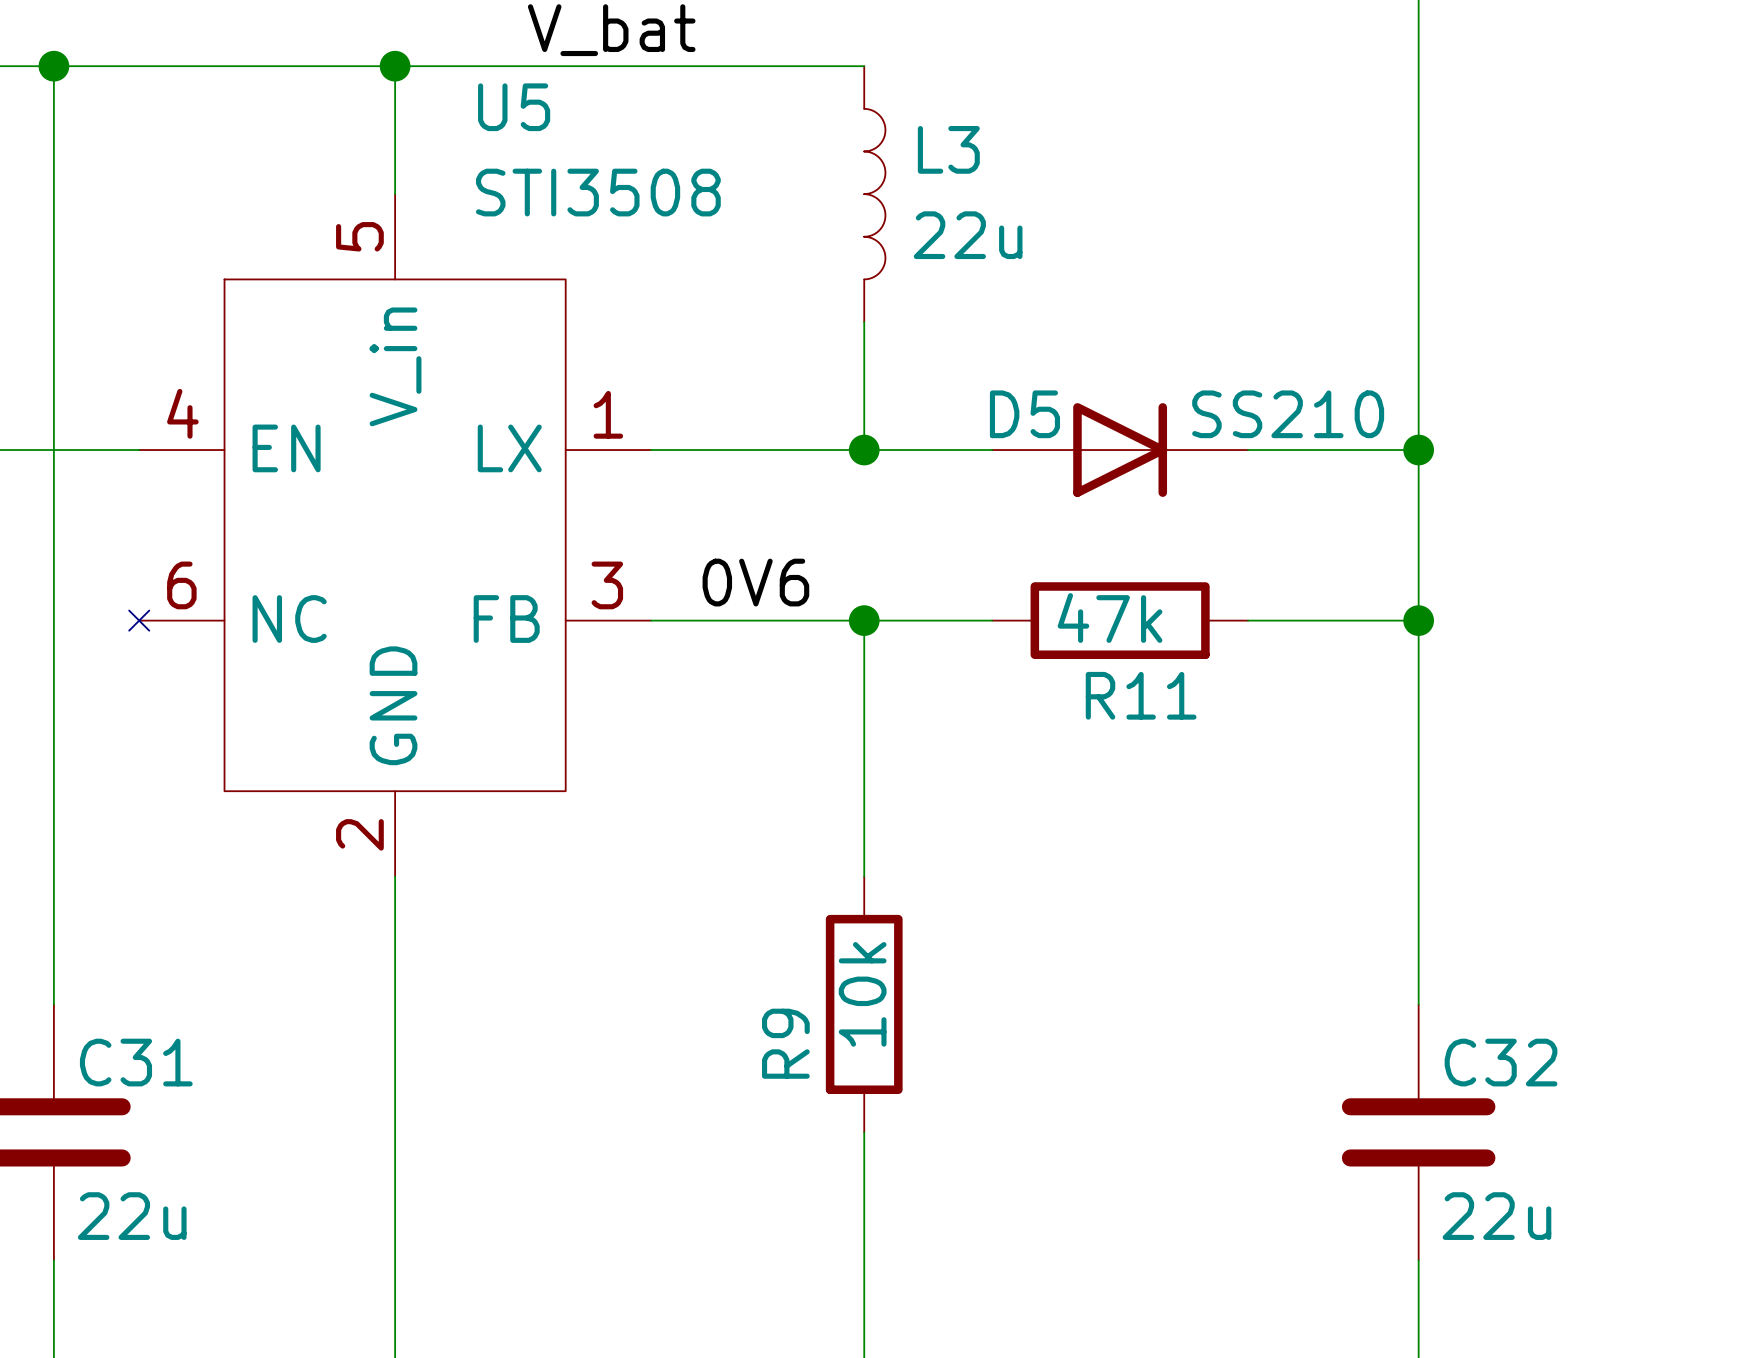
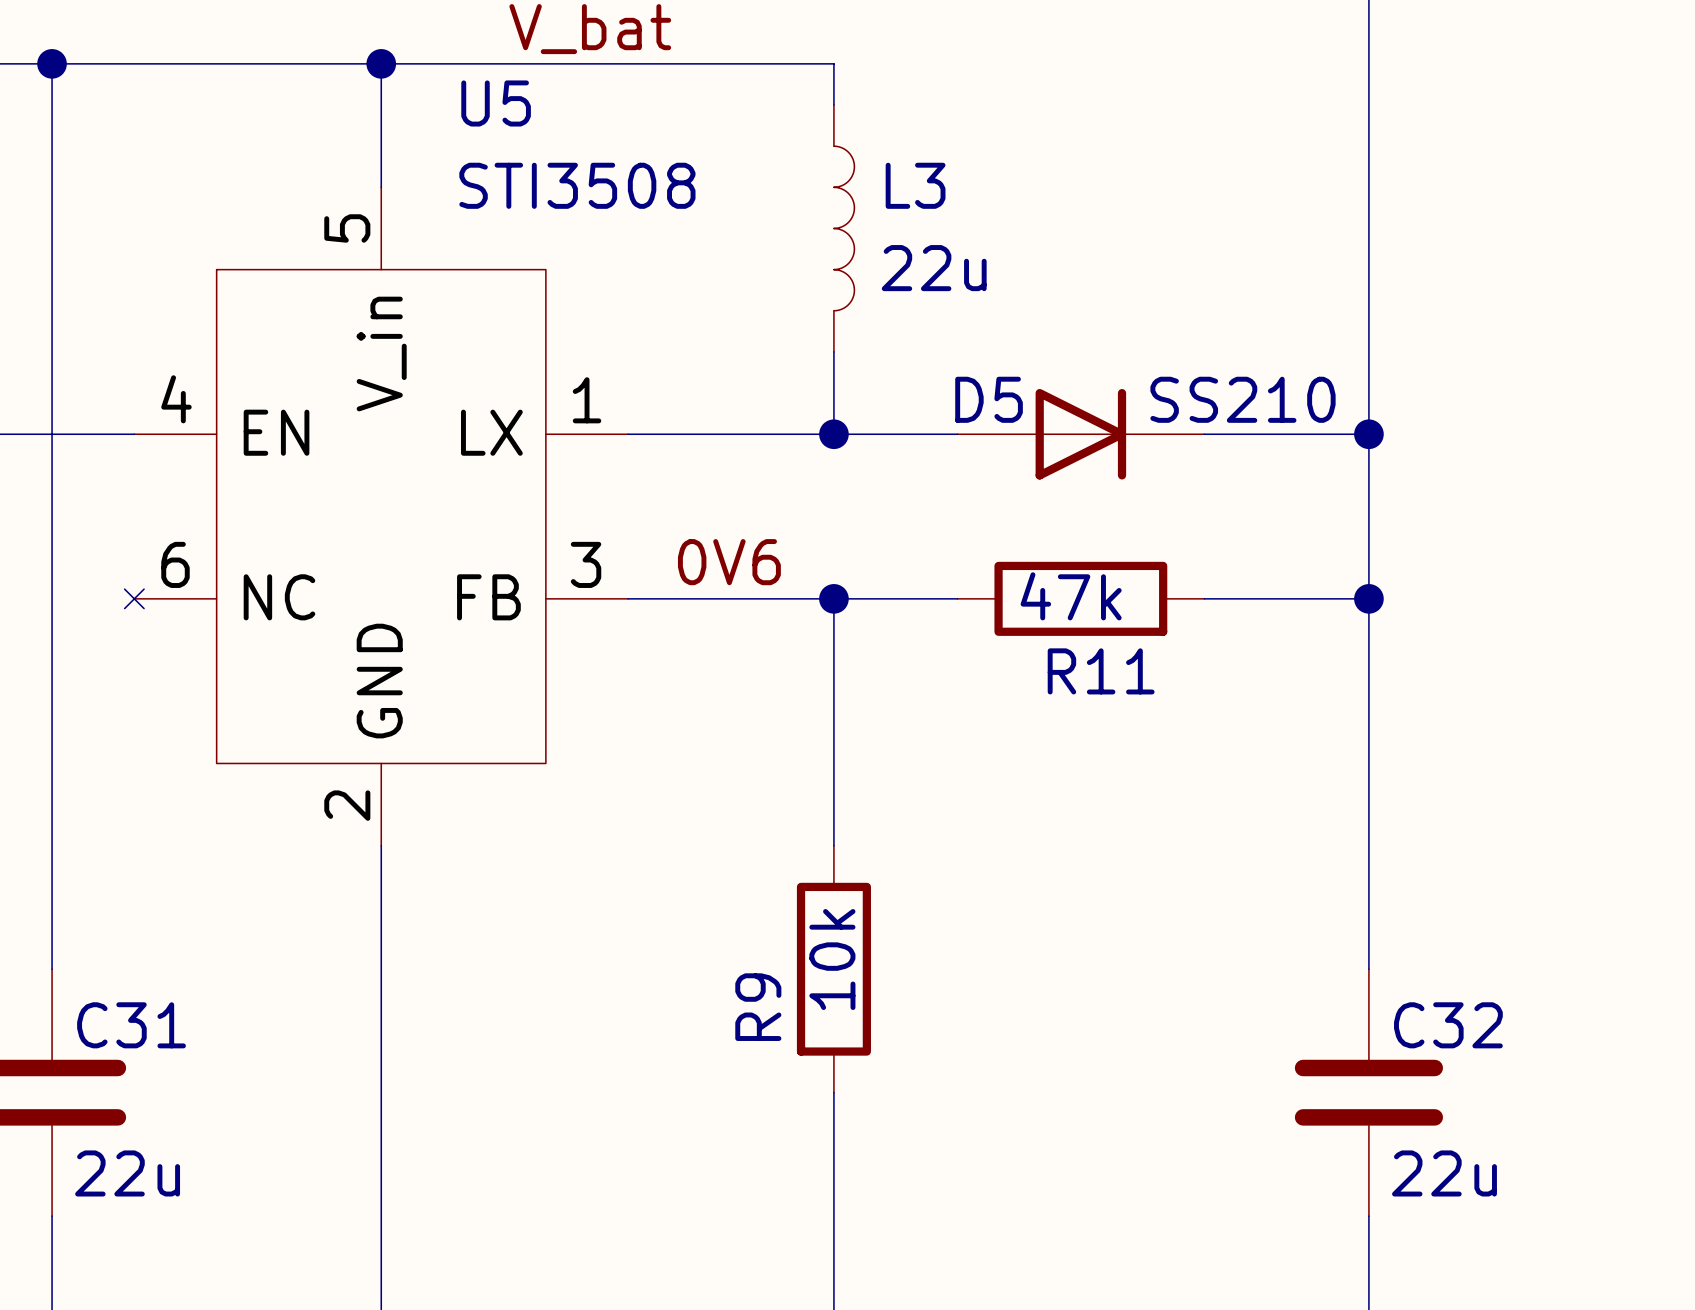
L3 position: (874, 194) -> (844, 228)

